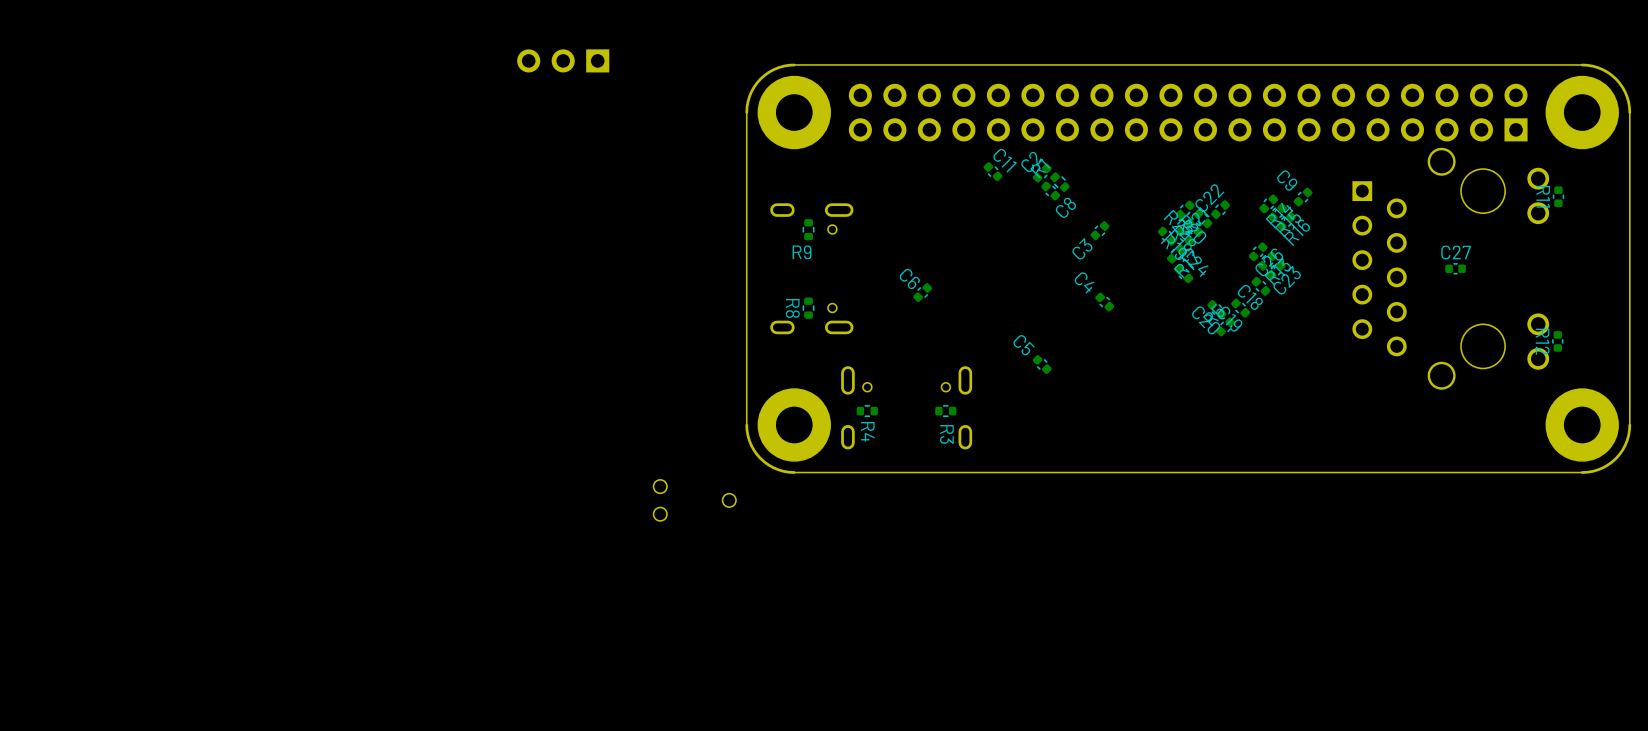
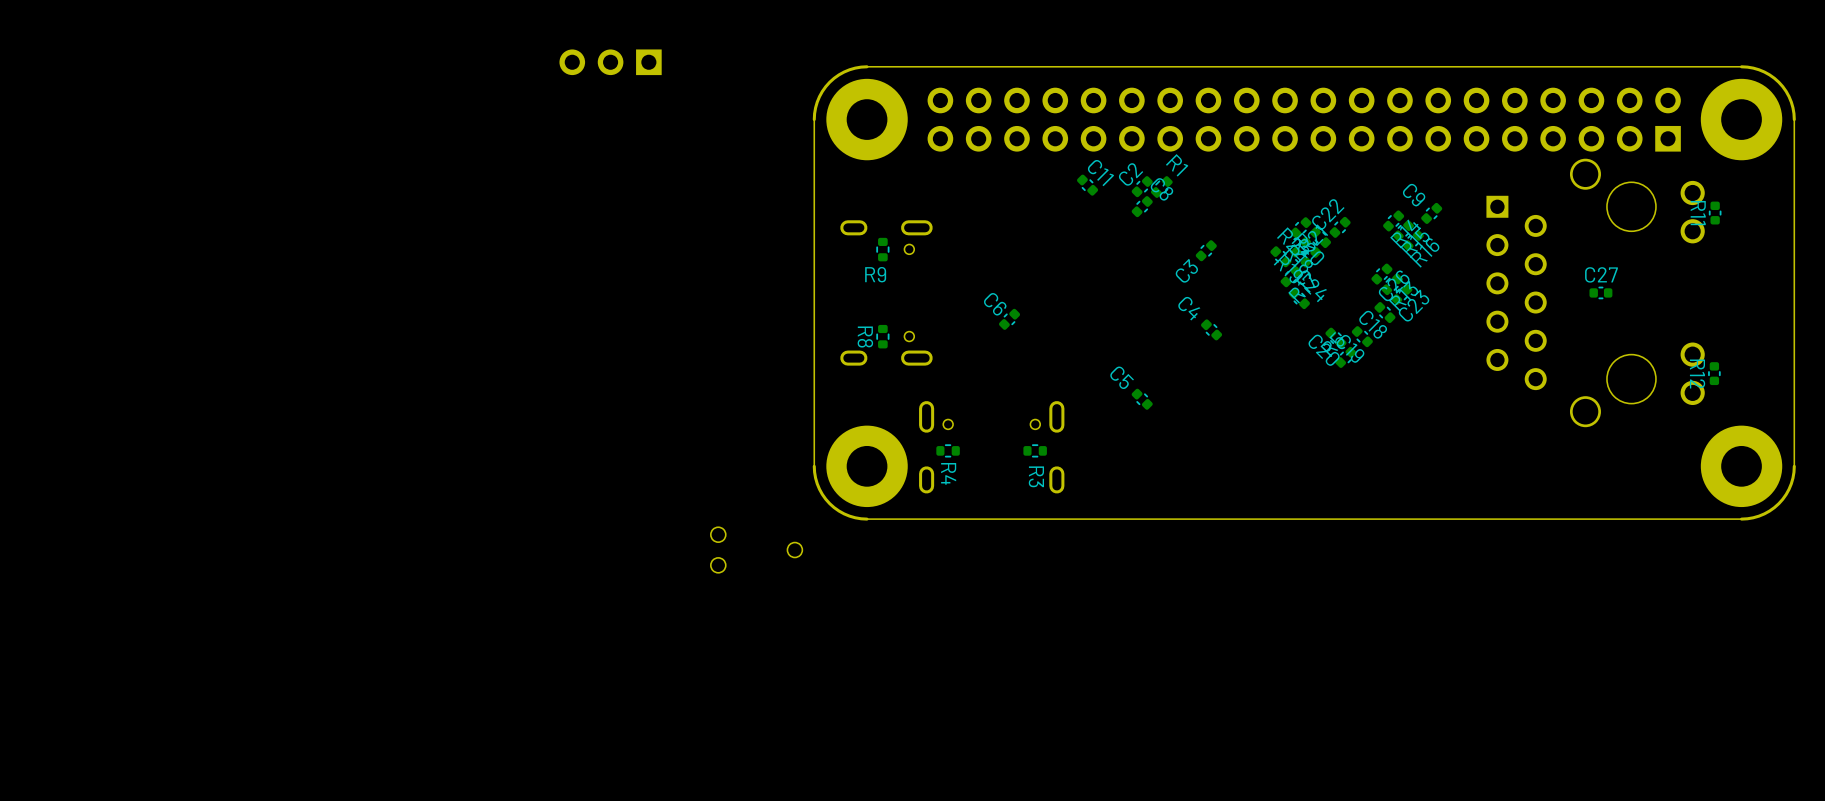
R1 rotation: 0° (1059, 182) -> 90° clockwise (1161, 187)
C8 rotation: 0° (1050, 190) -> 90° clockwise (1142, 206)
C8 name position: C8 (1065, 207) -> C8 (1161, 189)

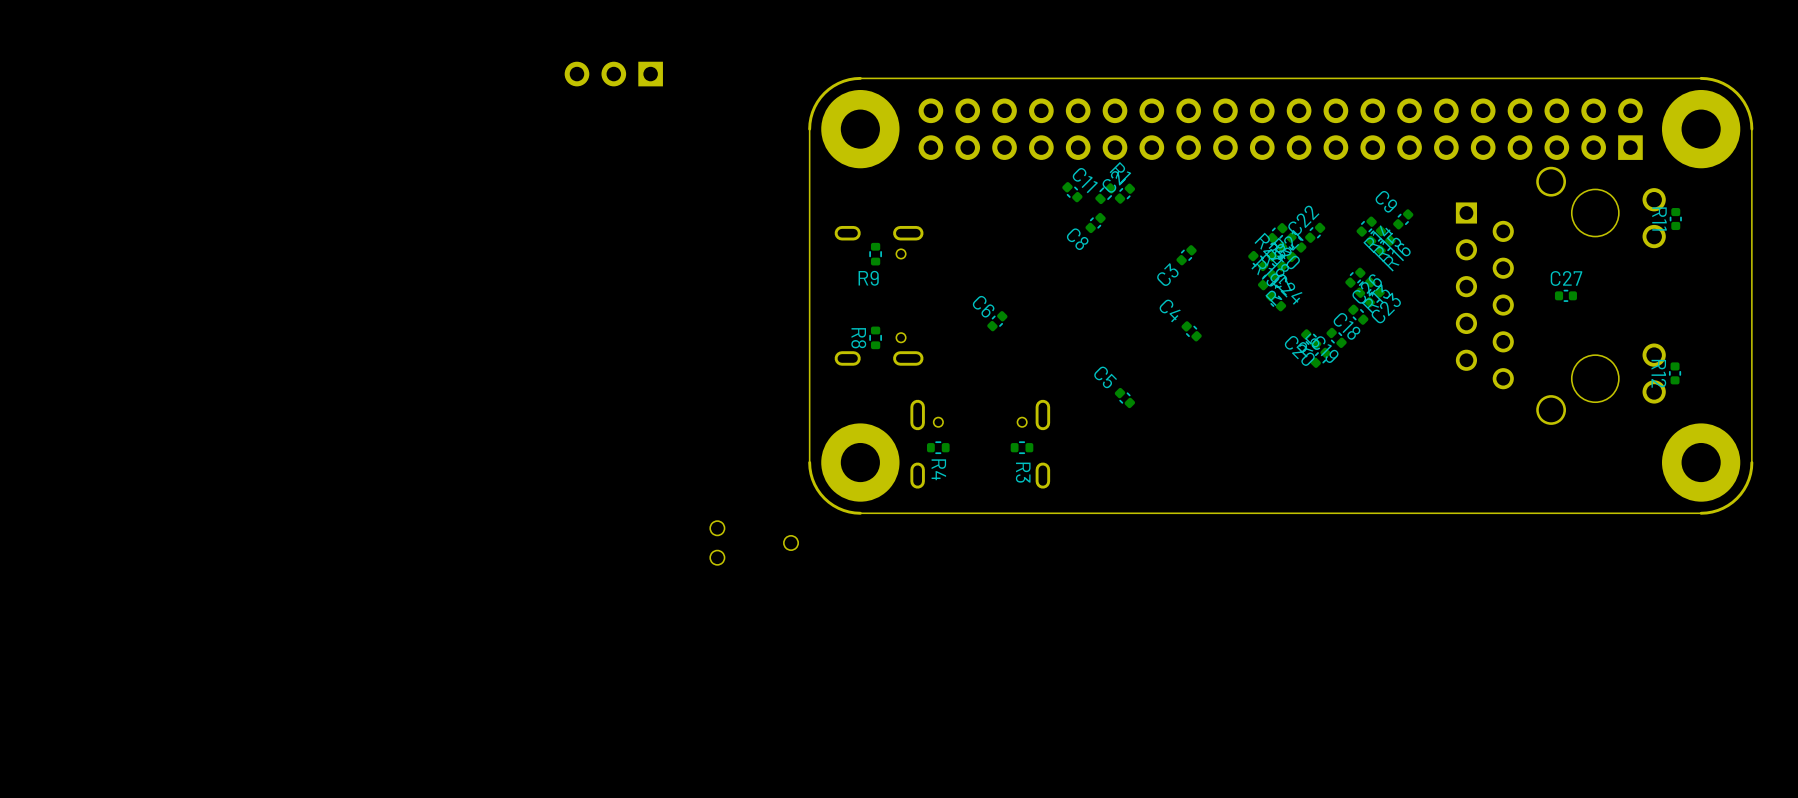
R1 position: (1161, 187) -> (1105, 193)
C8 name position: C8 (1161, 189) -> C8 (1077, 239)
C8 position: (1142, 206) -> (1095, 222)

